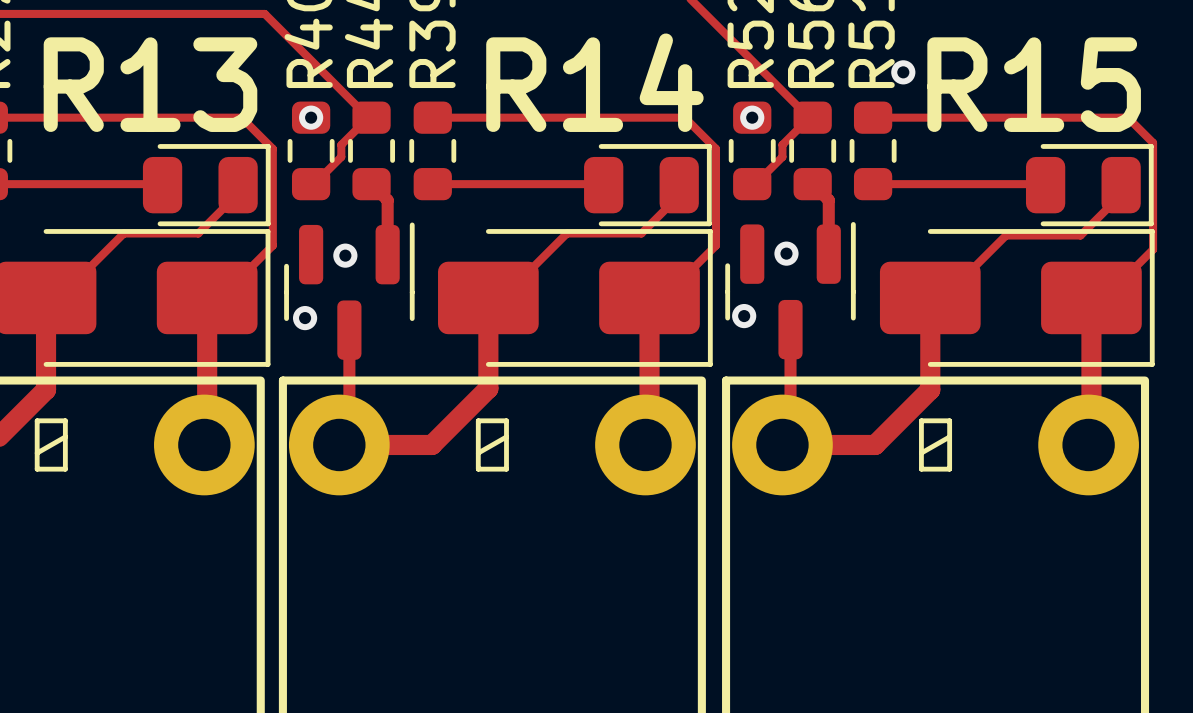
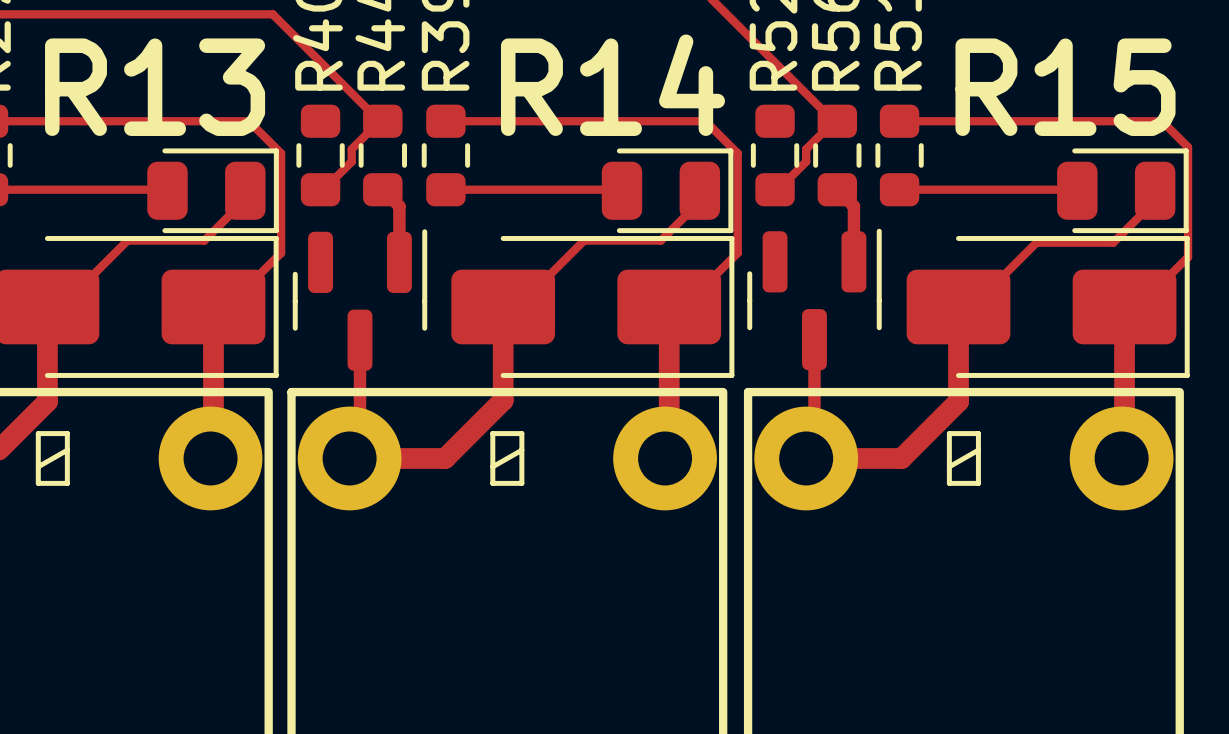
via: (903, 72) -> none
via: (311, 117) -> none
via: (752, 117) -> none
via: (786, 253) -> none
via: (345, 255) -> none
via: (744, 316) -> none
via: (305, 318) -> none

